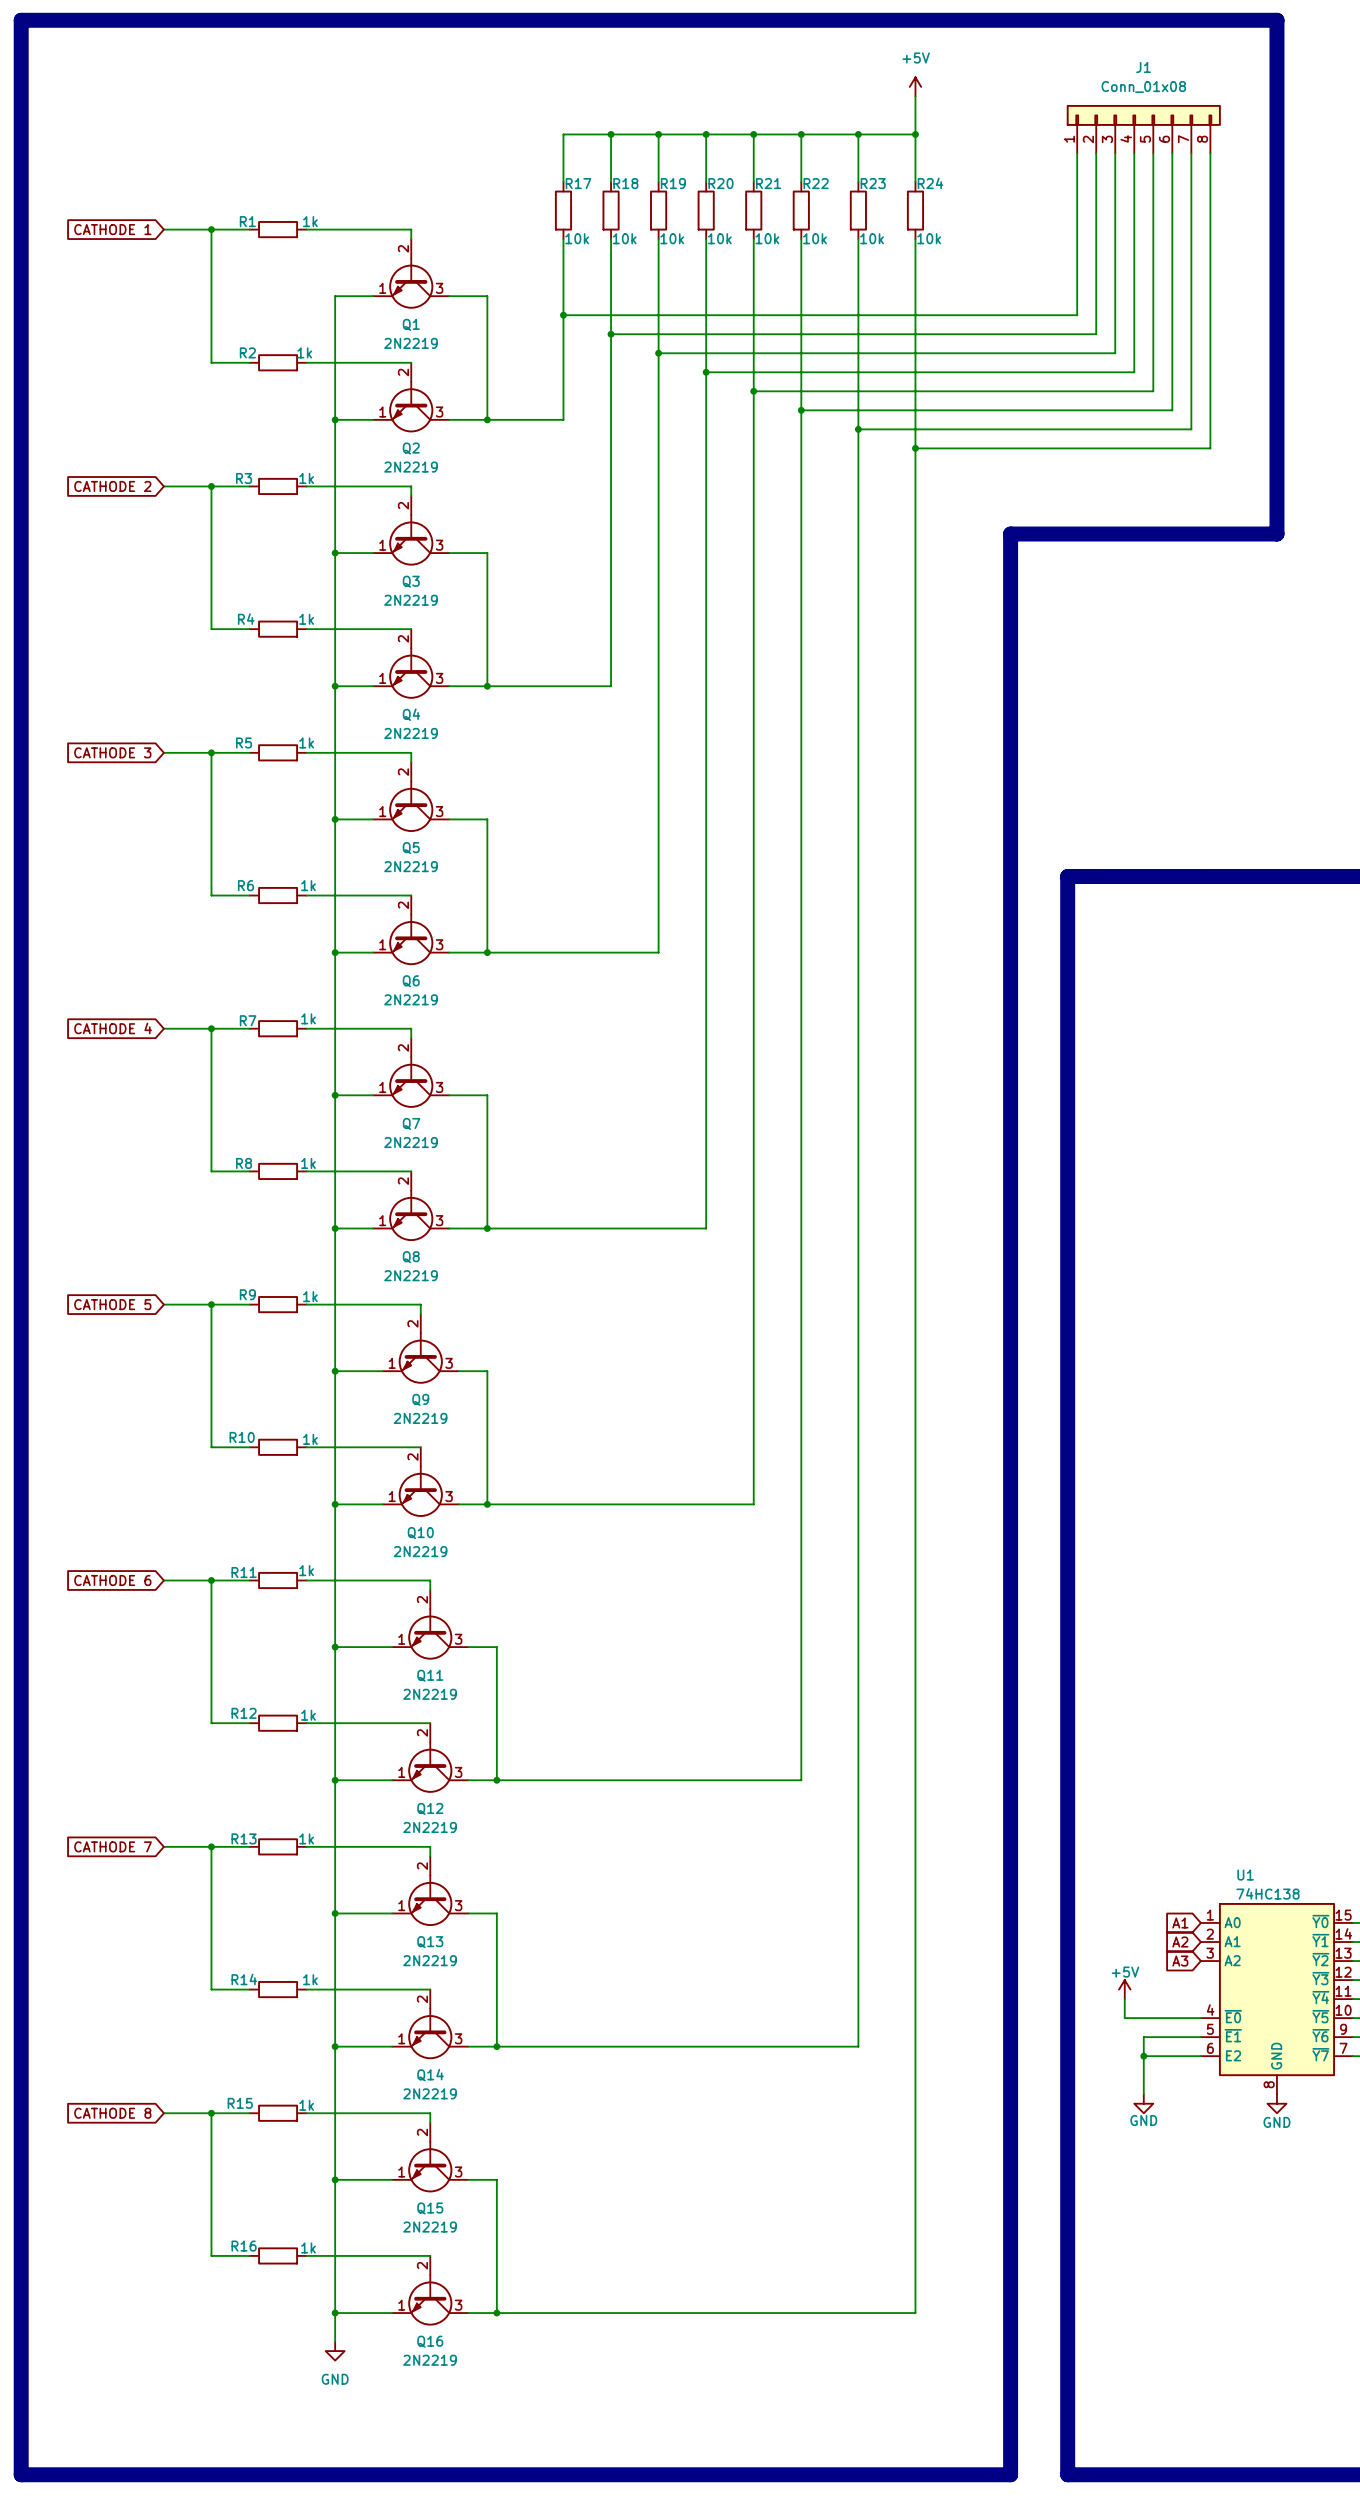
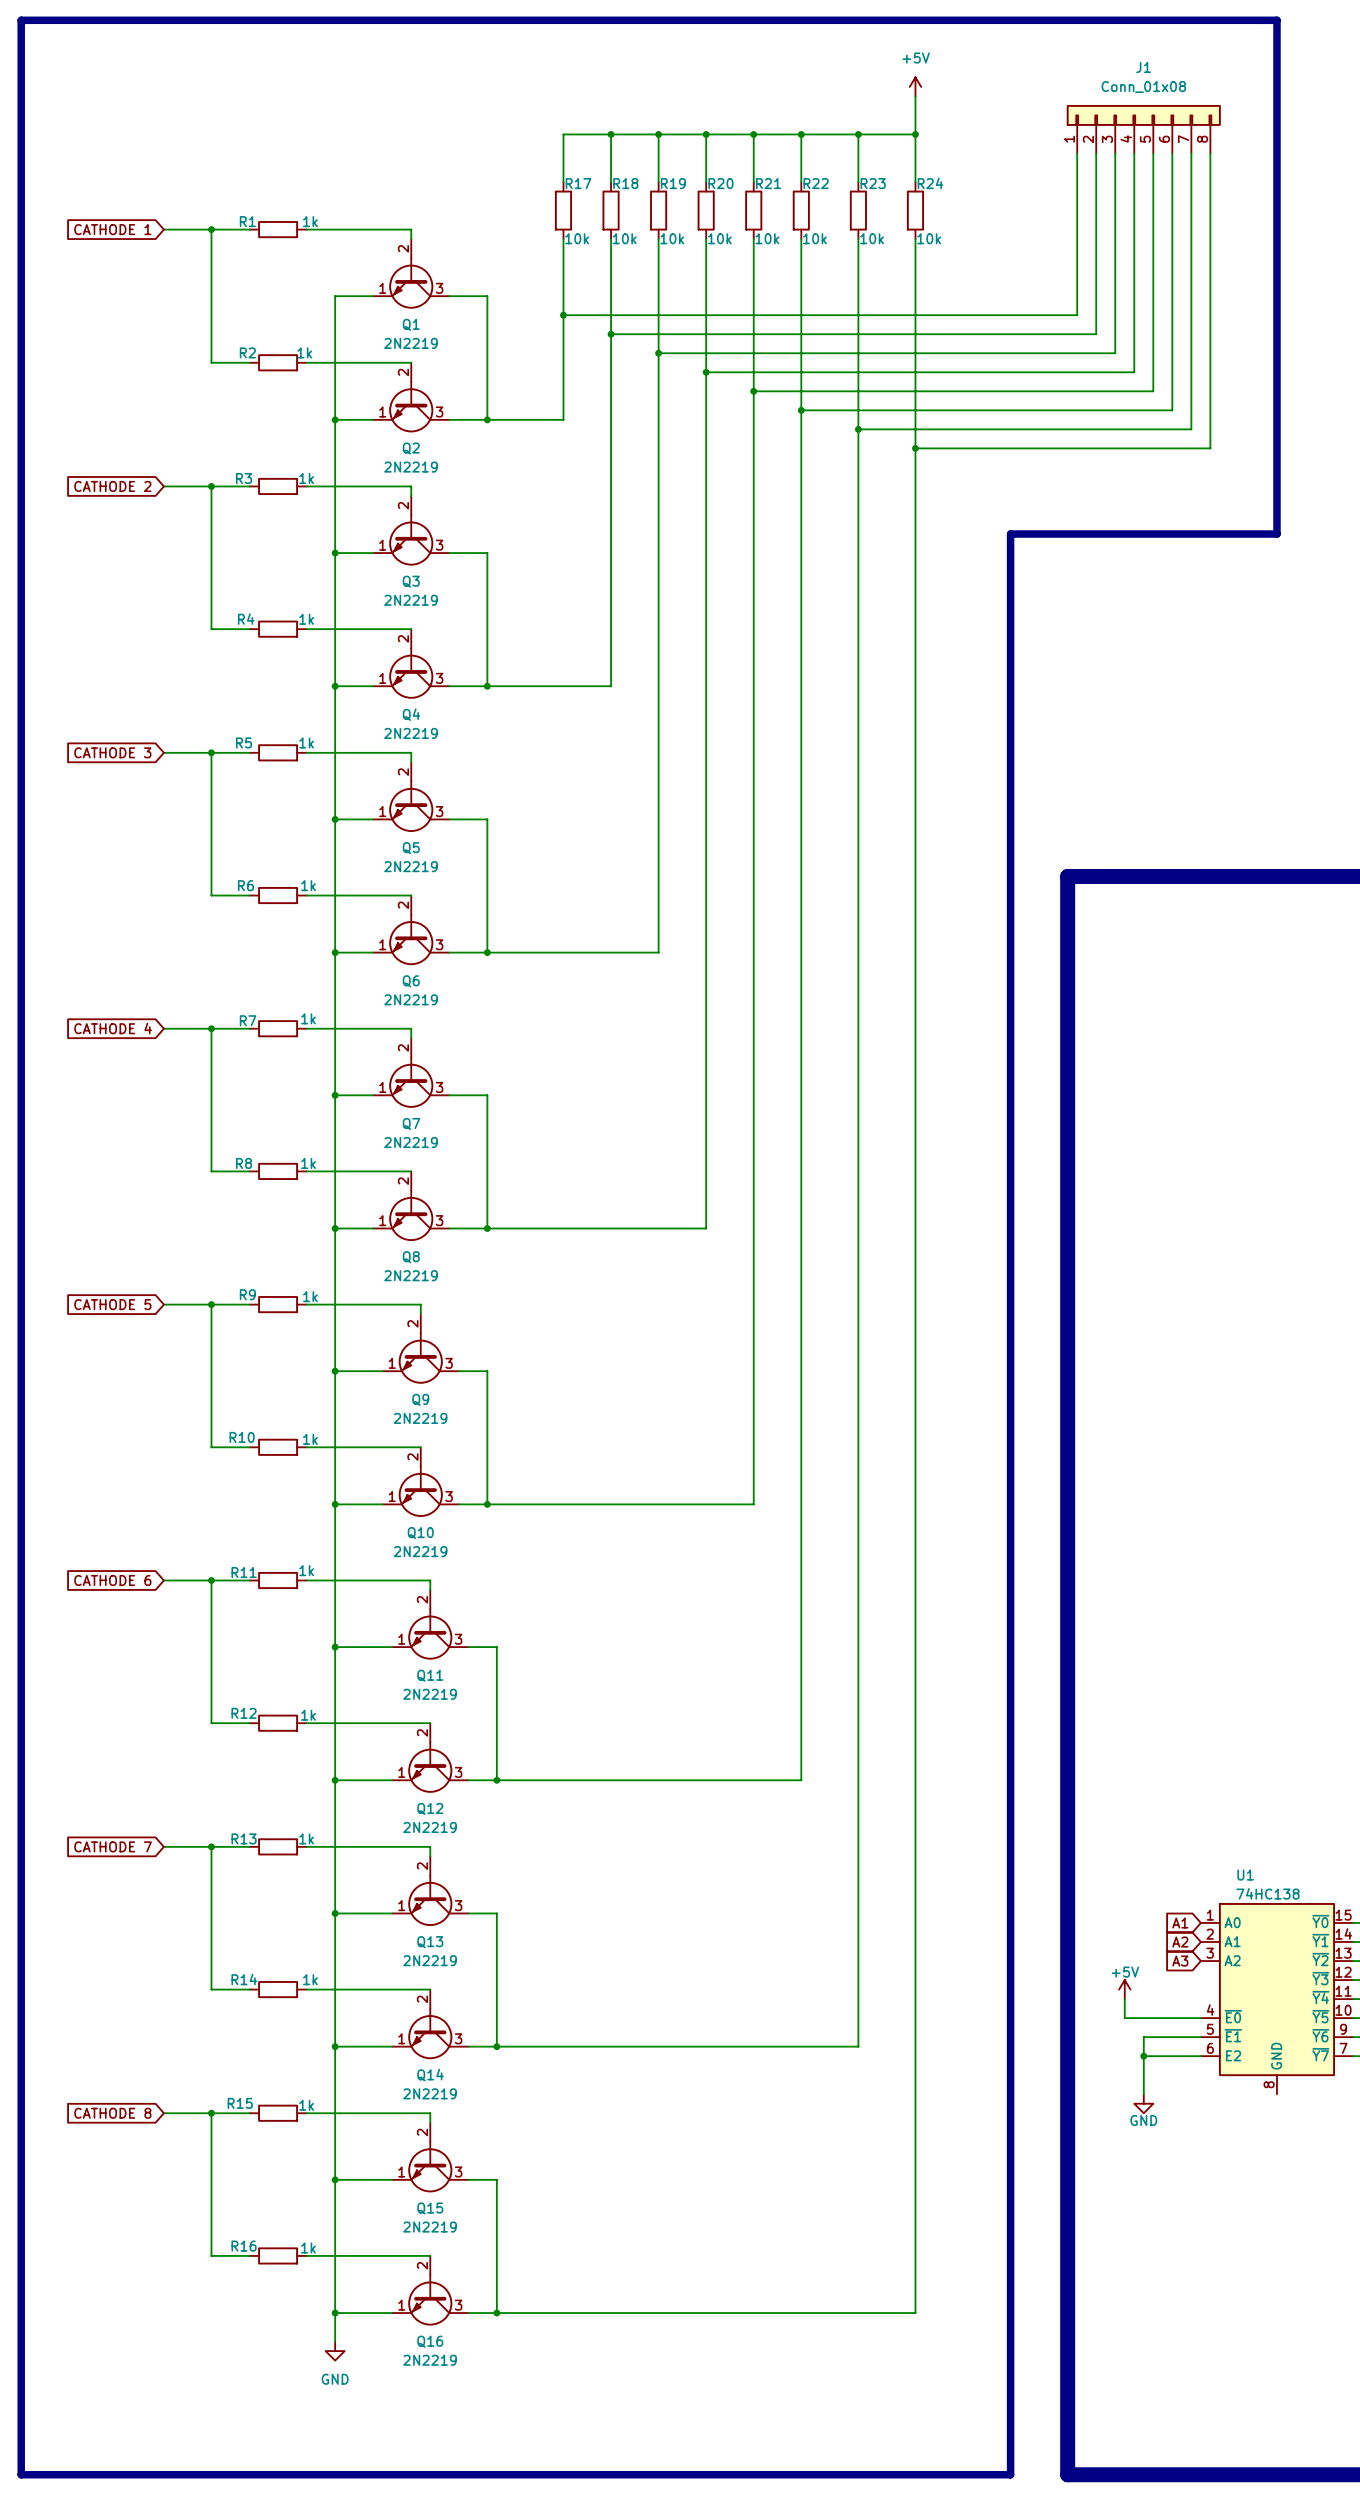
line width: thick (21, 20) (1276, 20) (1276, 534) (1010, 534) (1010, 2474) (21, 2474) (21, 20) -> thin (21, 20) (1276, 20) (1276, 534) (1010, 534) (1010, 2474) (21, 2474) (21, 20)
power symbol: GND (1276, 2103) -> none

